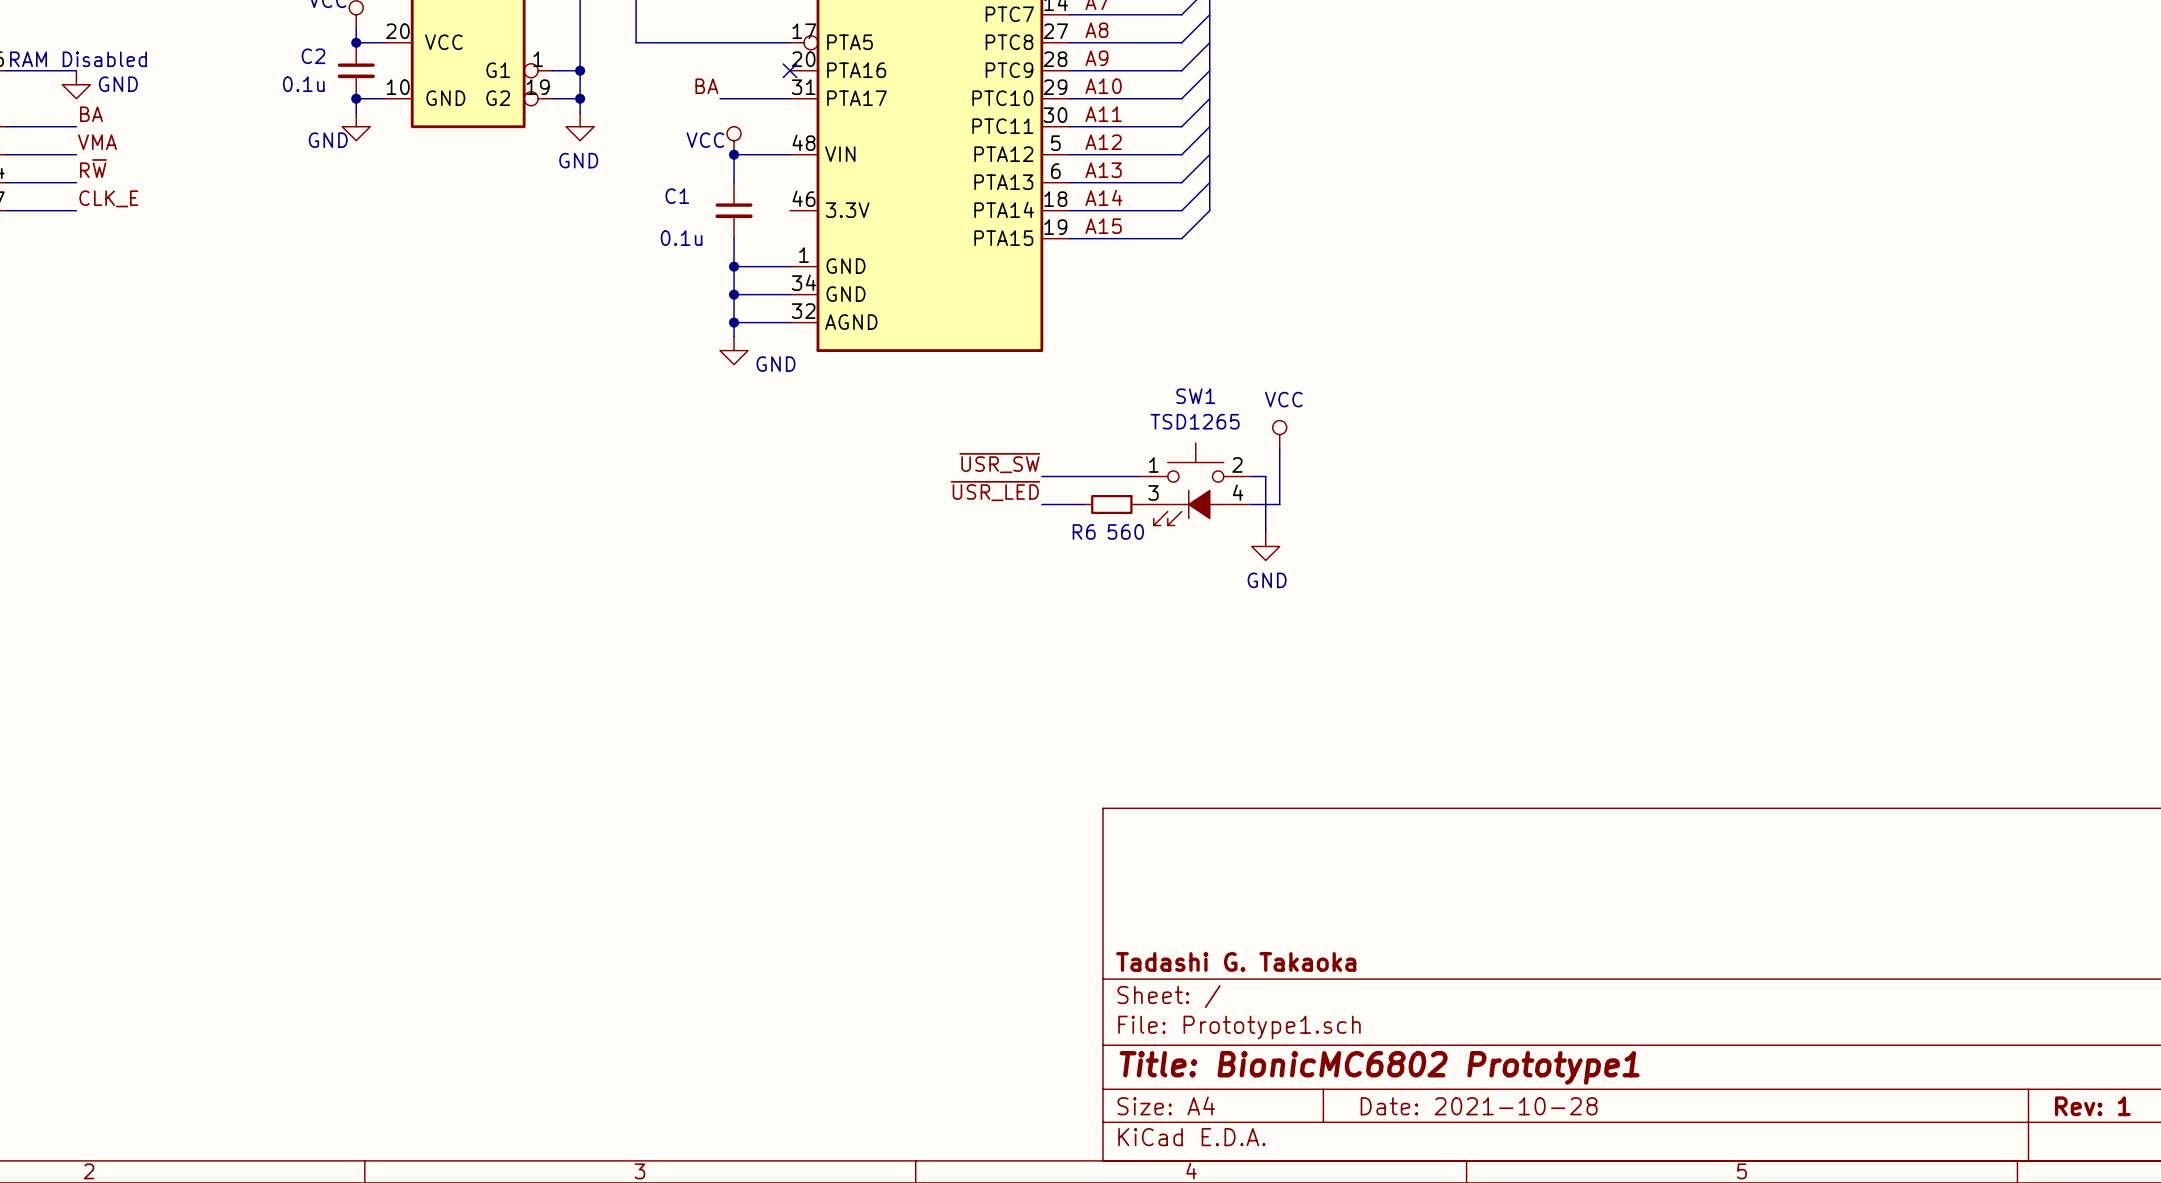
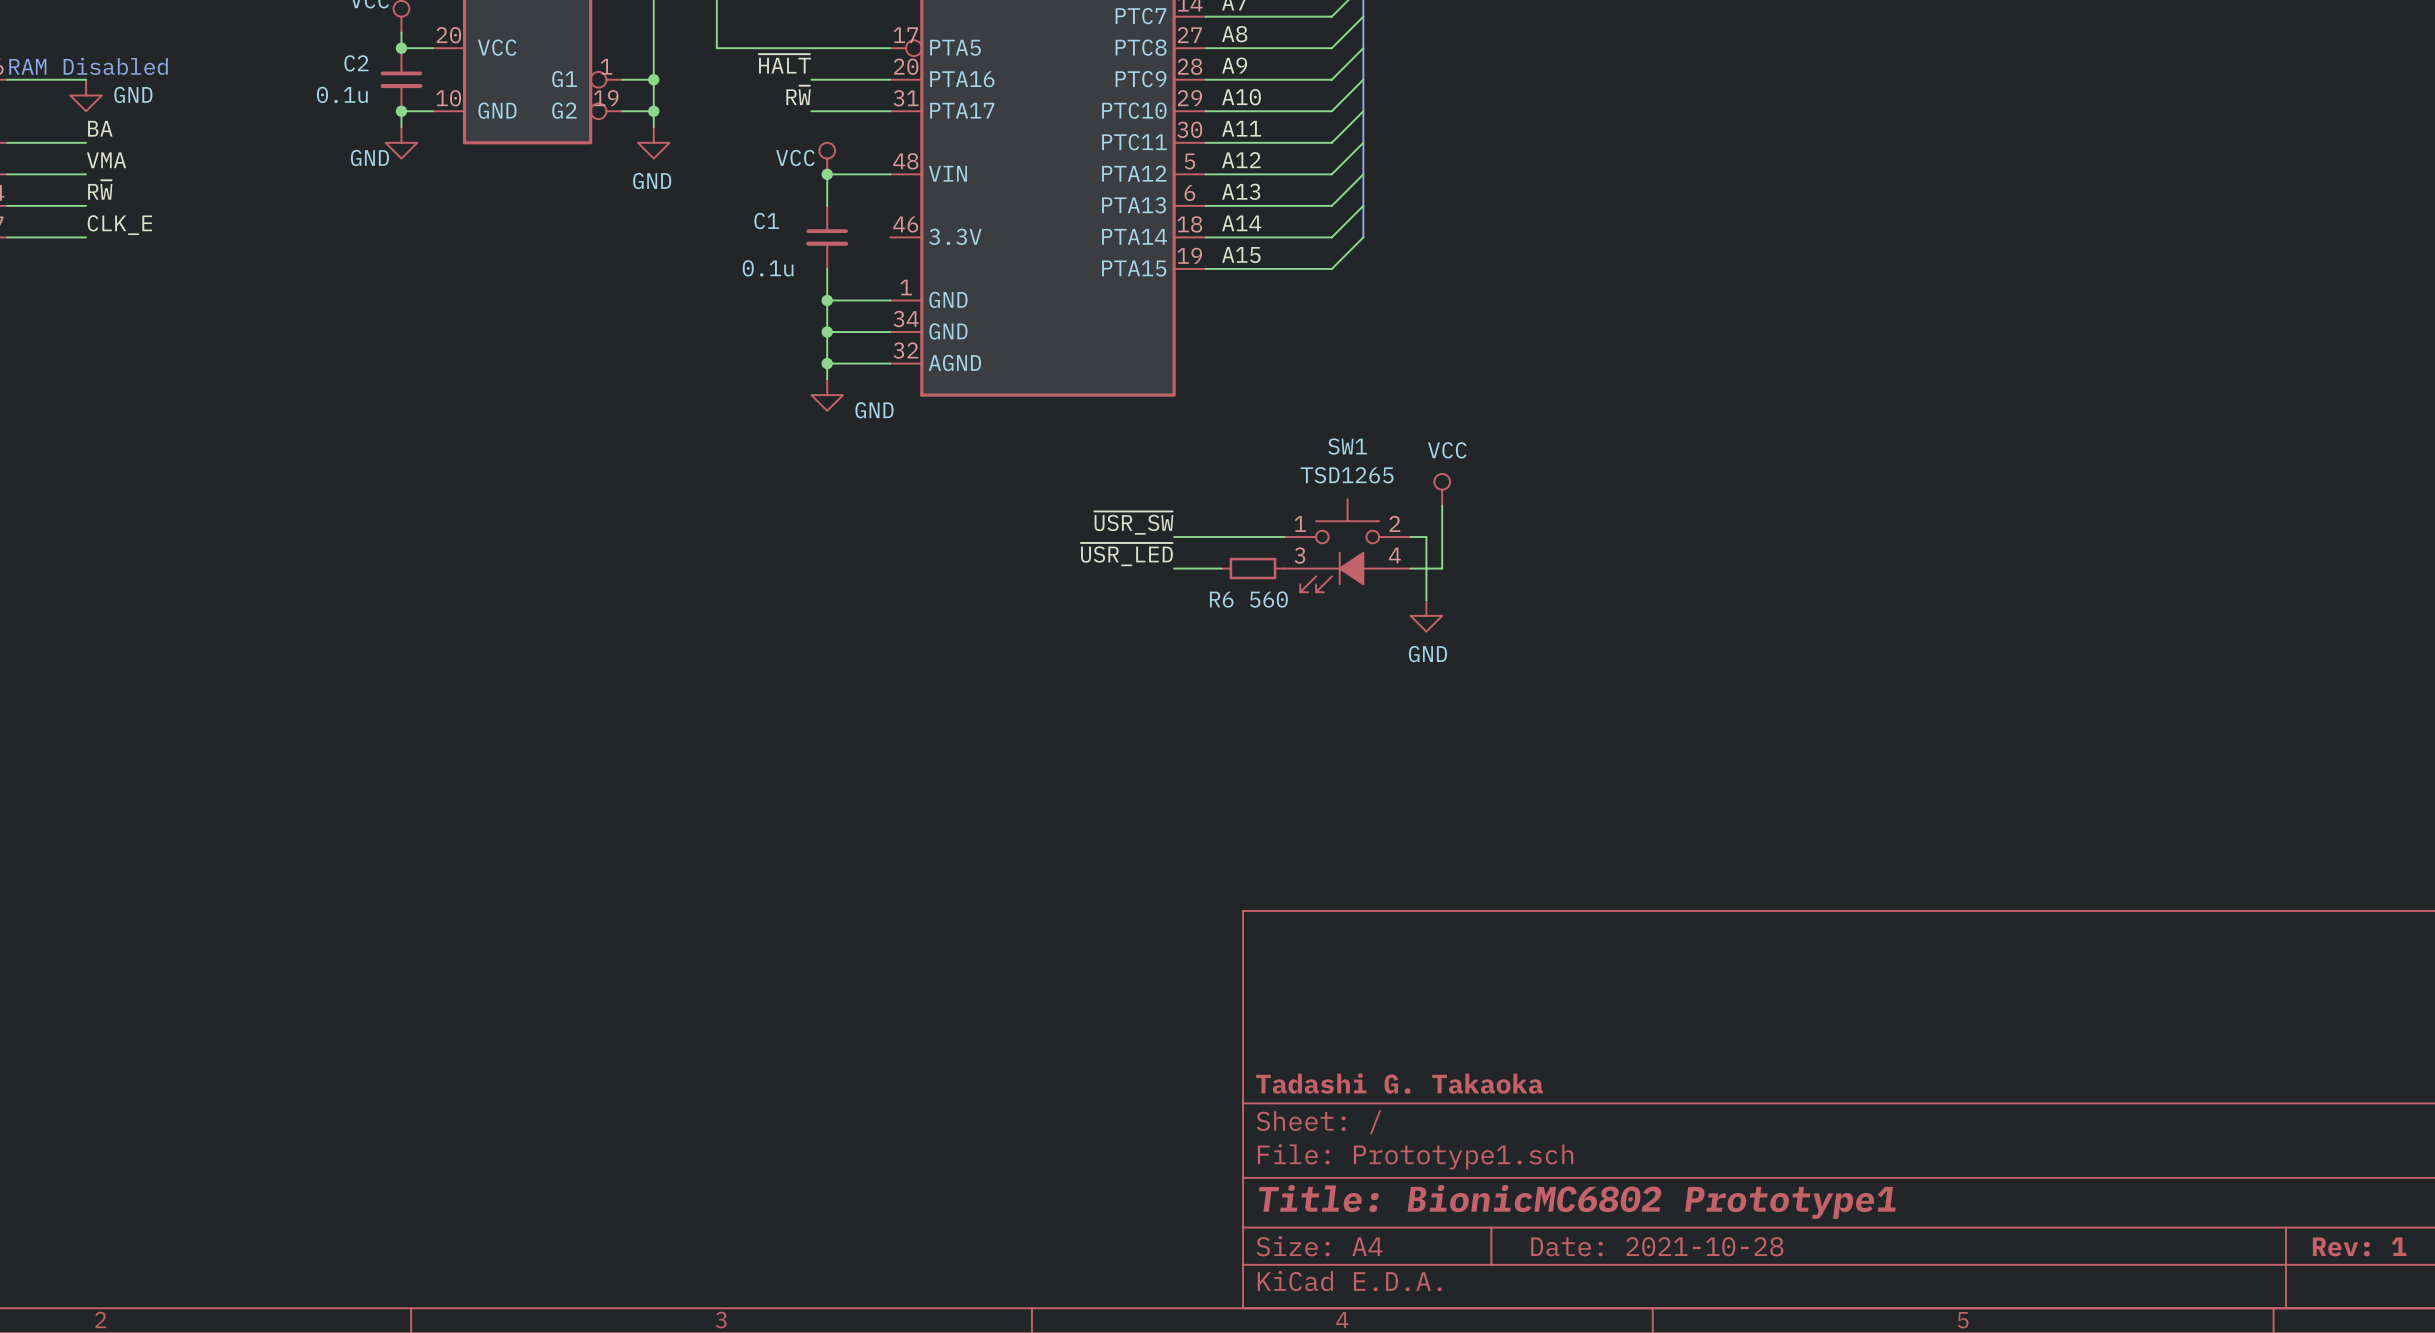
label: none -> ~{HALT} (784, 63)
wire: none -> (811, 79) (890, 79)
no-connect mark: (789, 70) -> none
label: BA (706, 86) -> R~{W} (798, 95)

